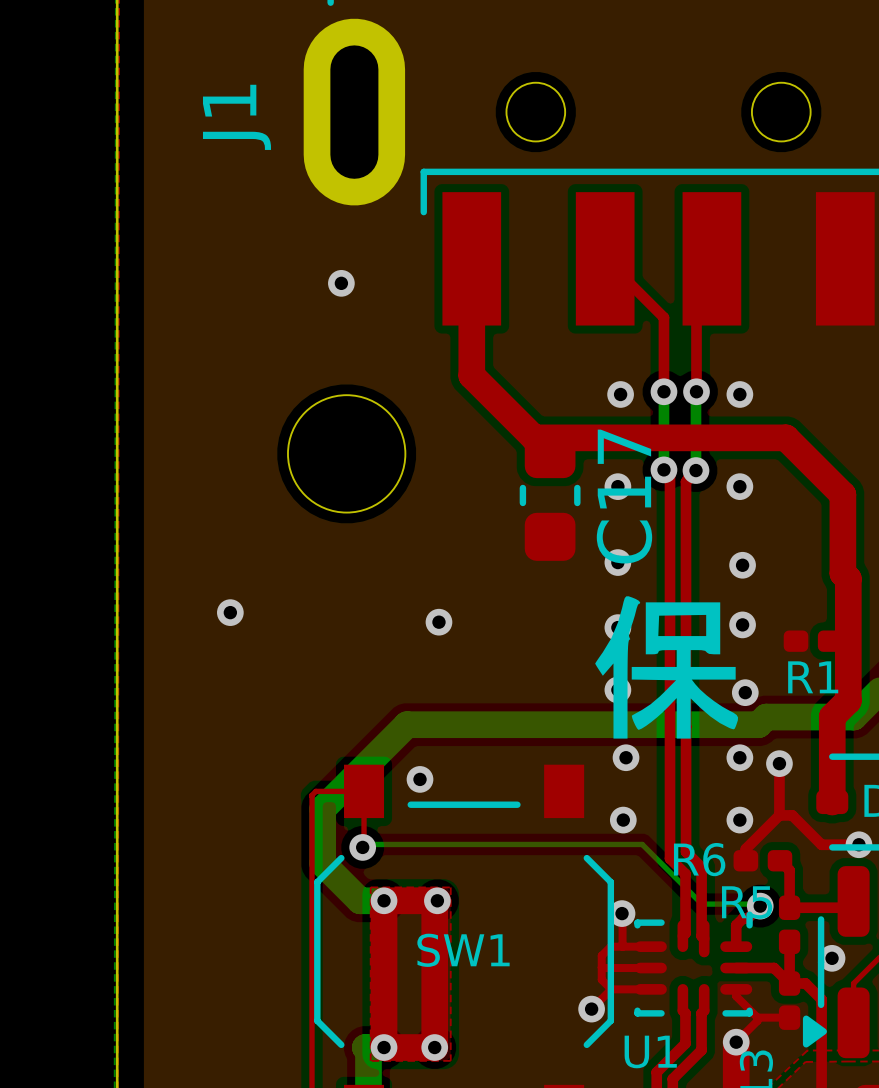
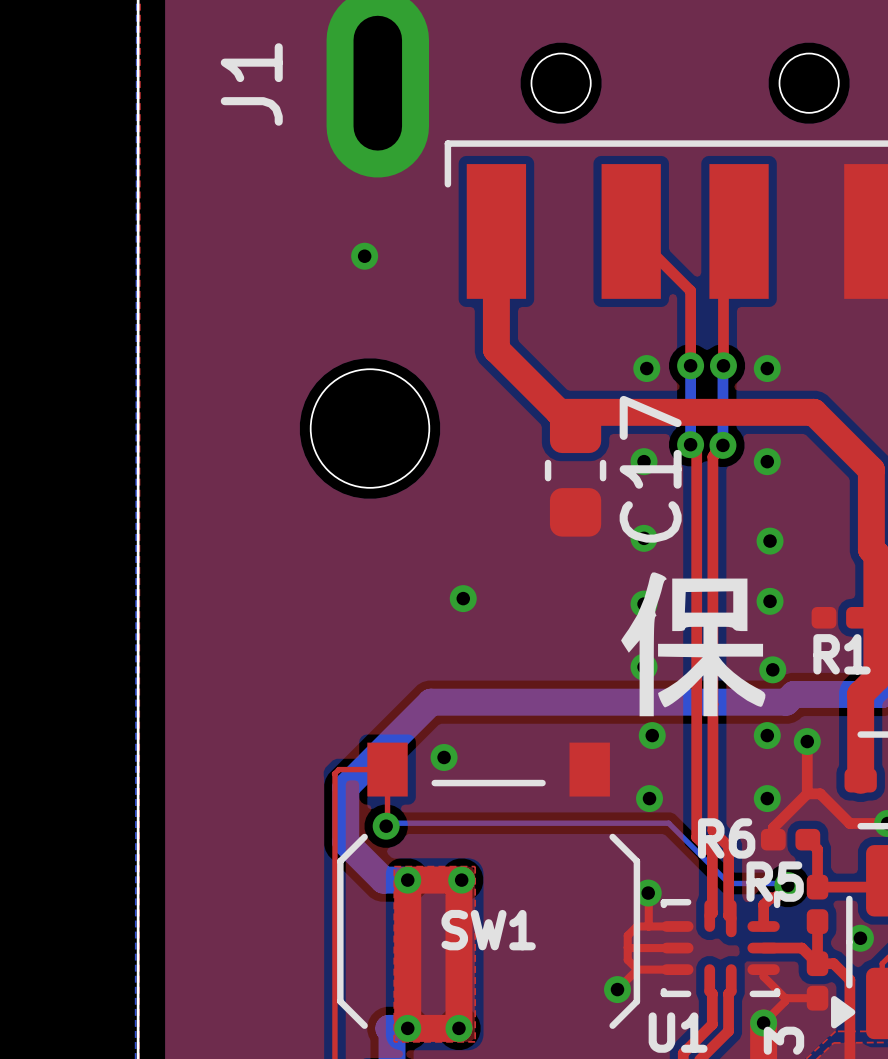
via: (230, 612) -> none

